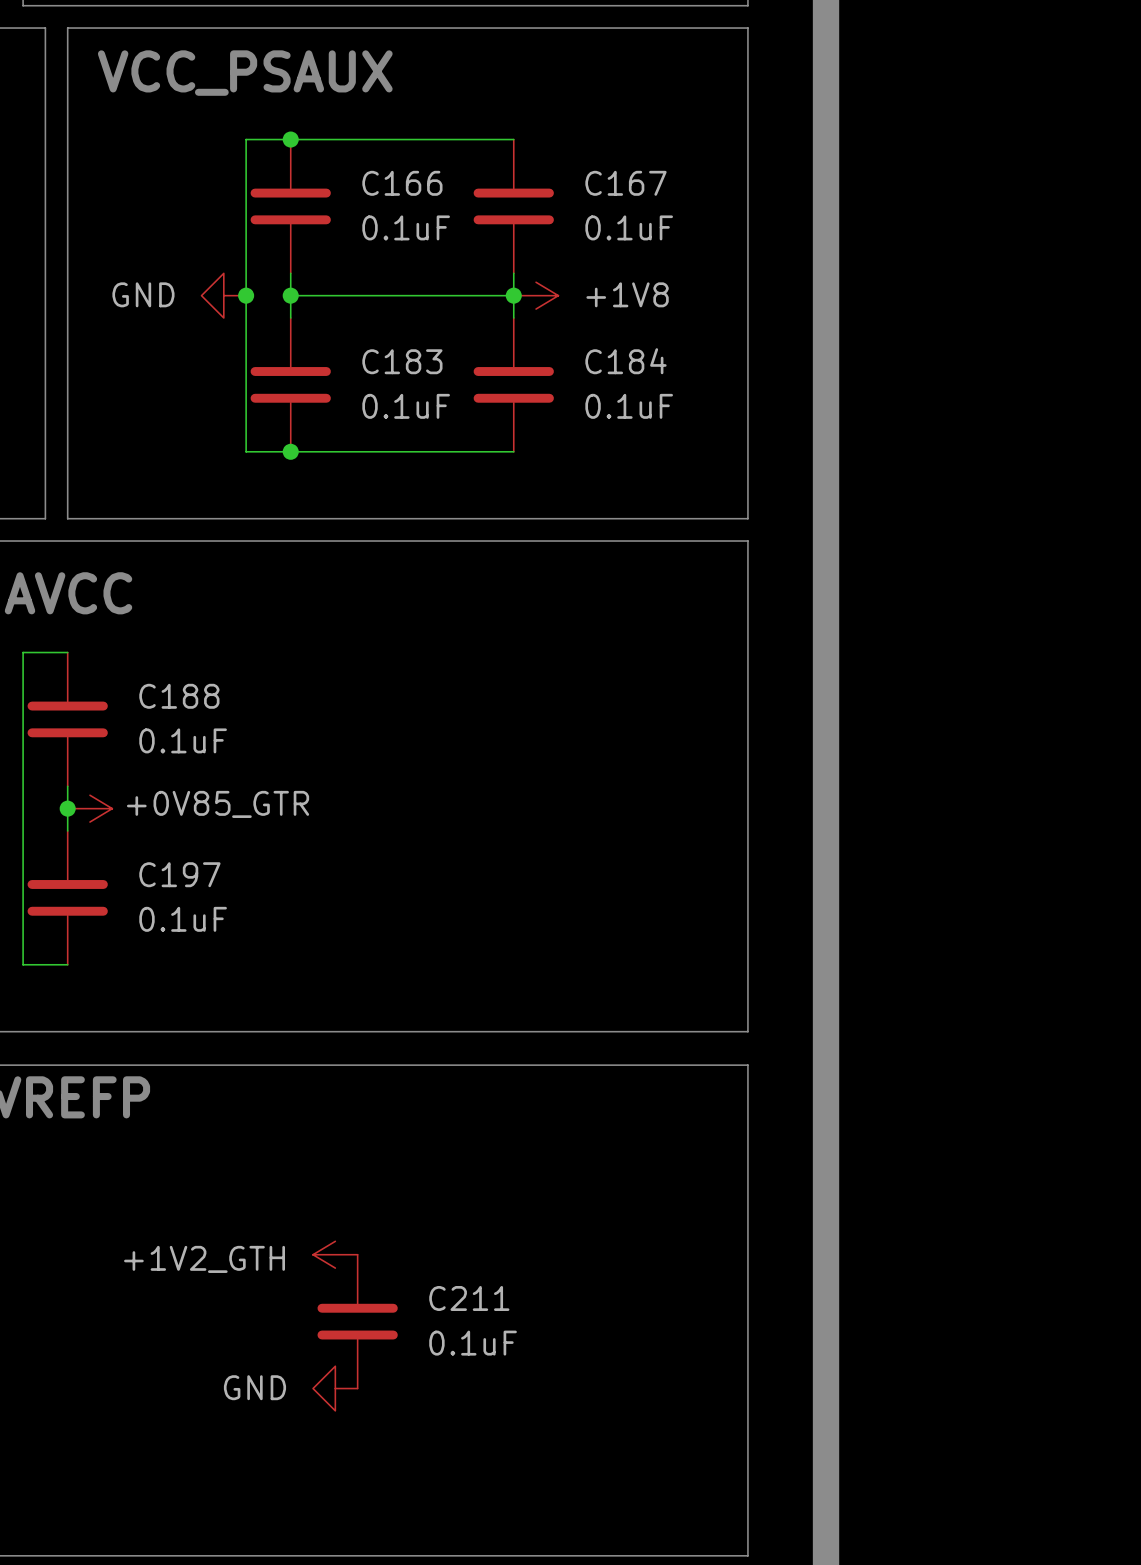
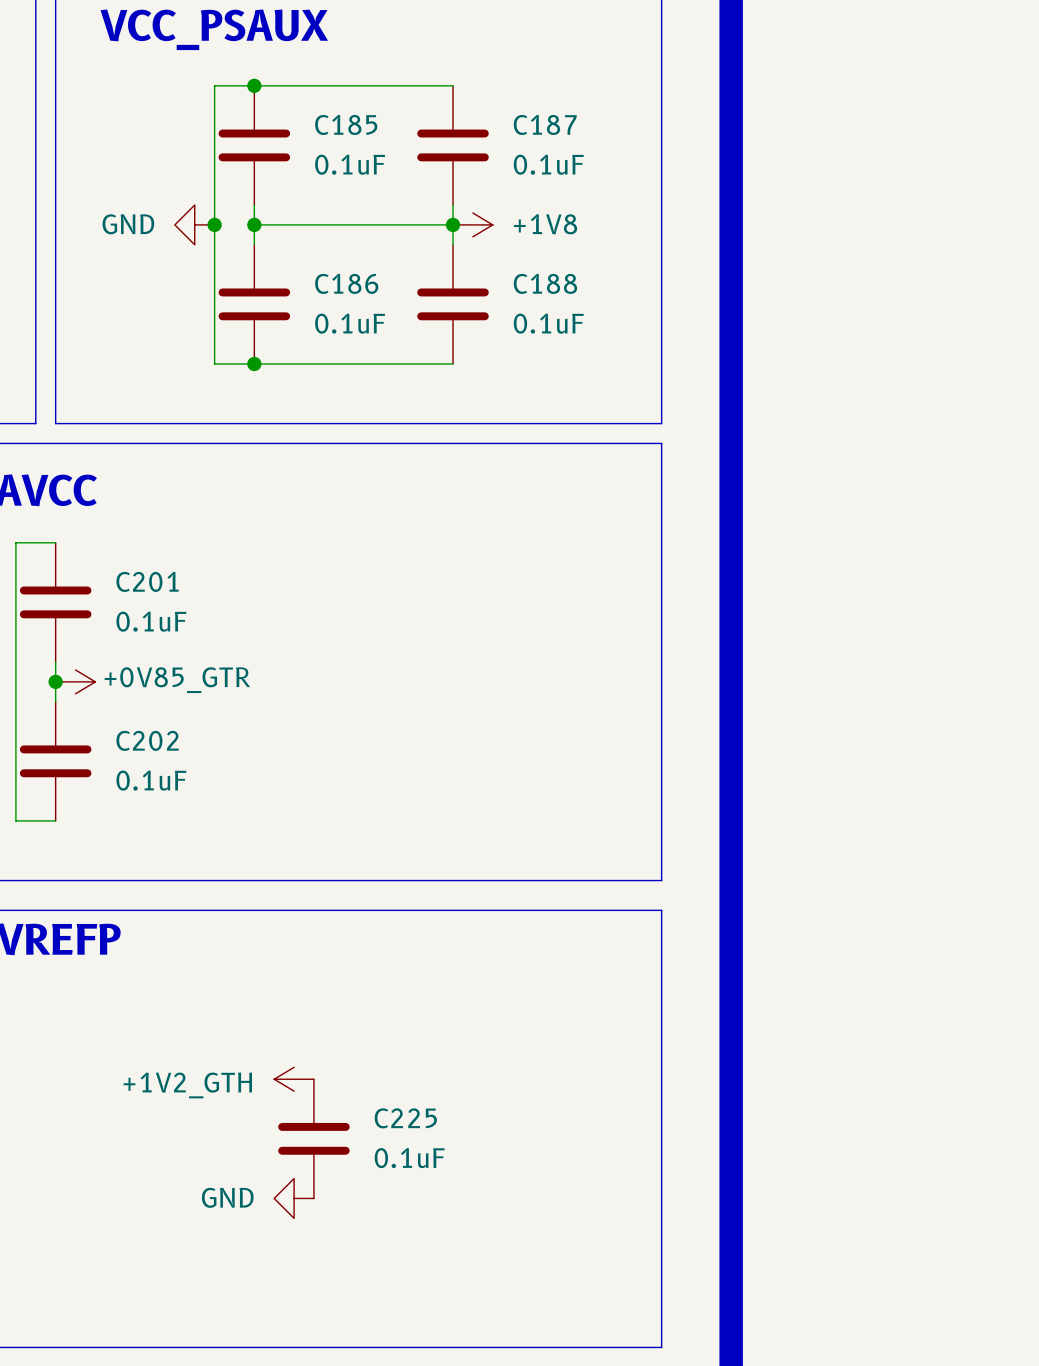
C166 name: C166 (402, 183) -> C185 (346, 124)
C167 name: C167 (625, 183) -> C187 (545, 124)
C183 name: C183 (402, 361) -> C186 (346, 283)
C184 name: C184 (625, 361) -> C188 (545, 283)
C188 name: C188 (179, 696) -> C201 (147, 581)
C197 name: C197 (179, 874) -> C202 (147, 740)
C211 name: C211 (469, 1298) -> C225 (405, 1118)

